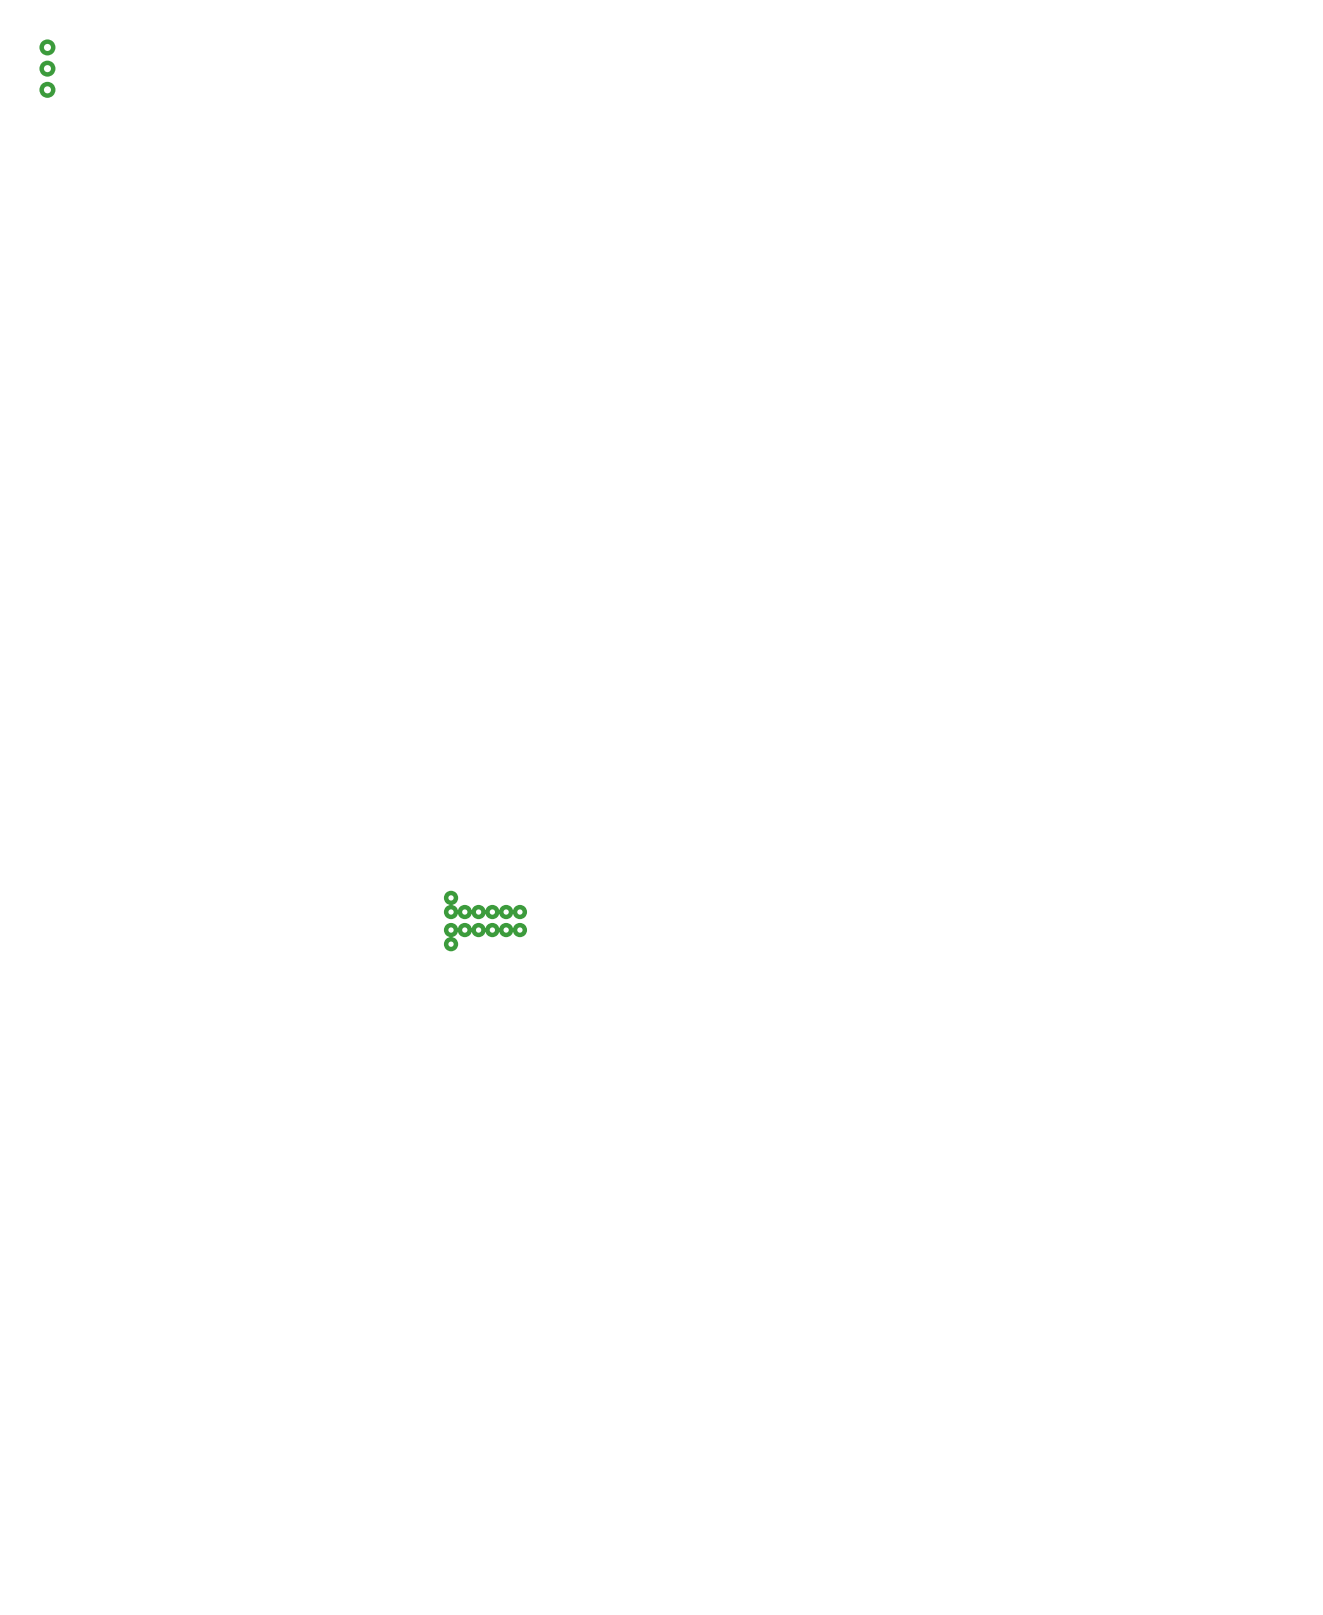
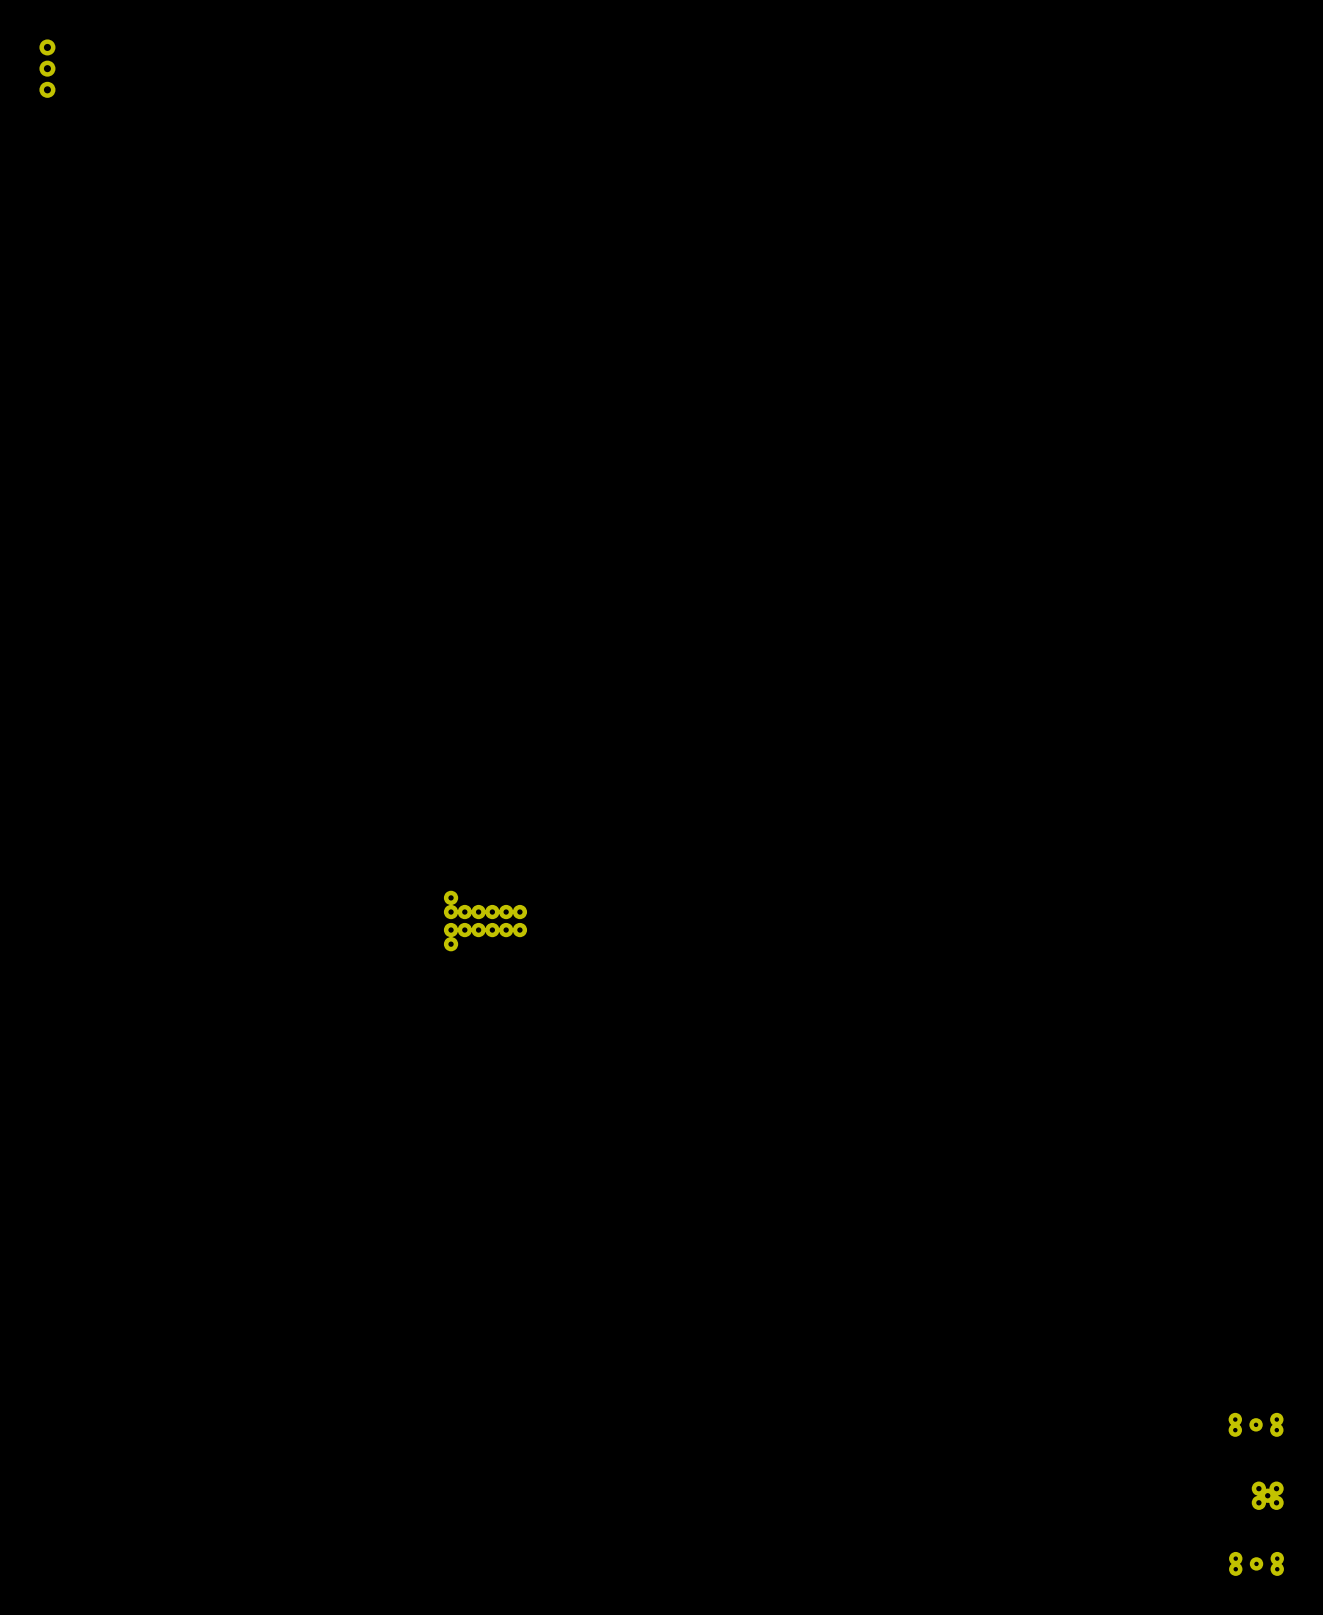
part: none -> (1256, 1424)
part: none -> (1267, 1495)
part: none -> (1256, 1563)

